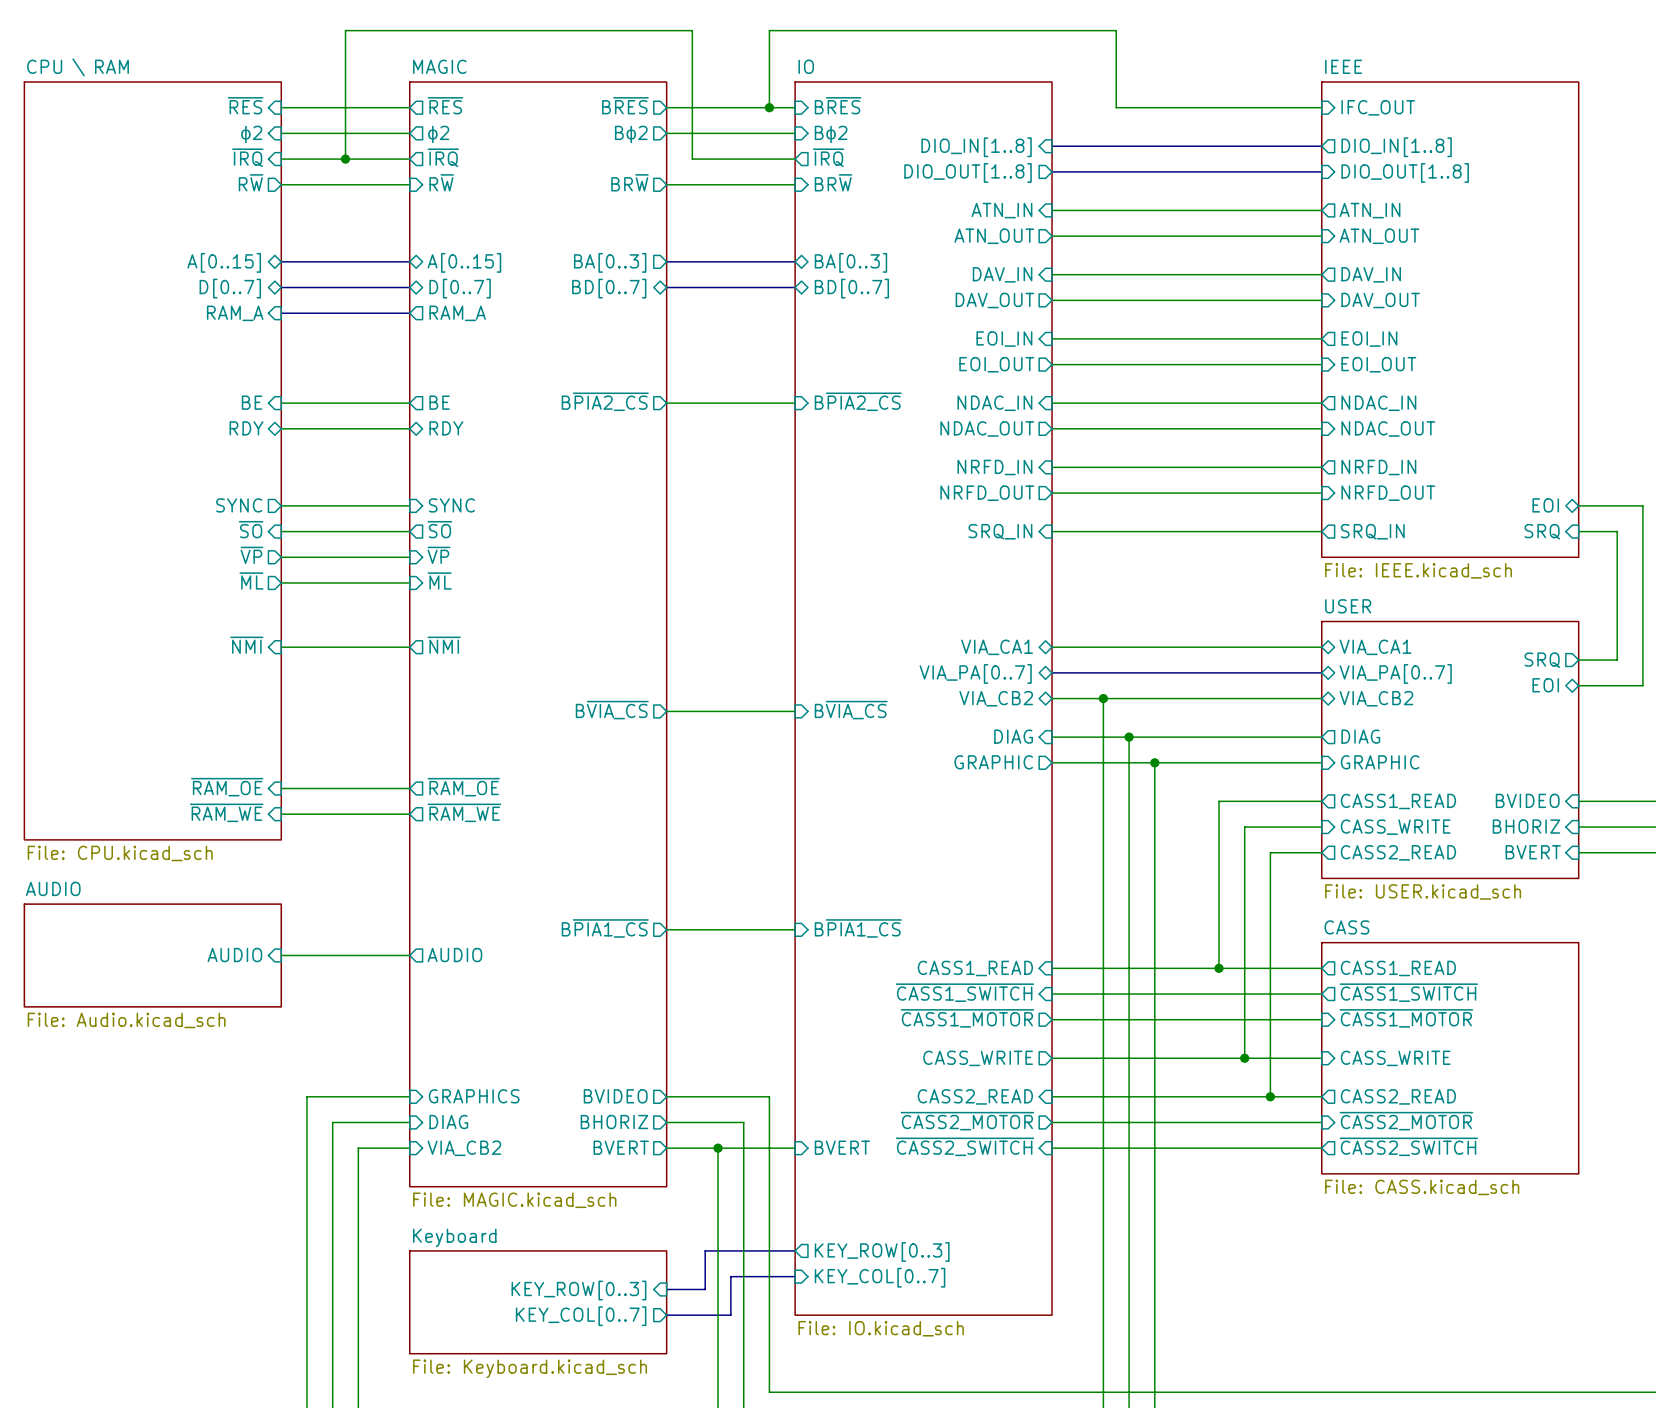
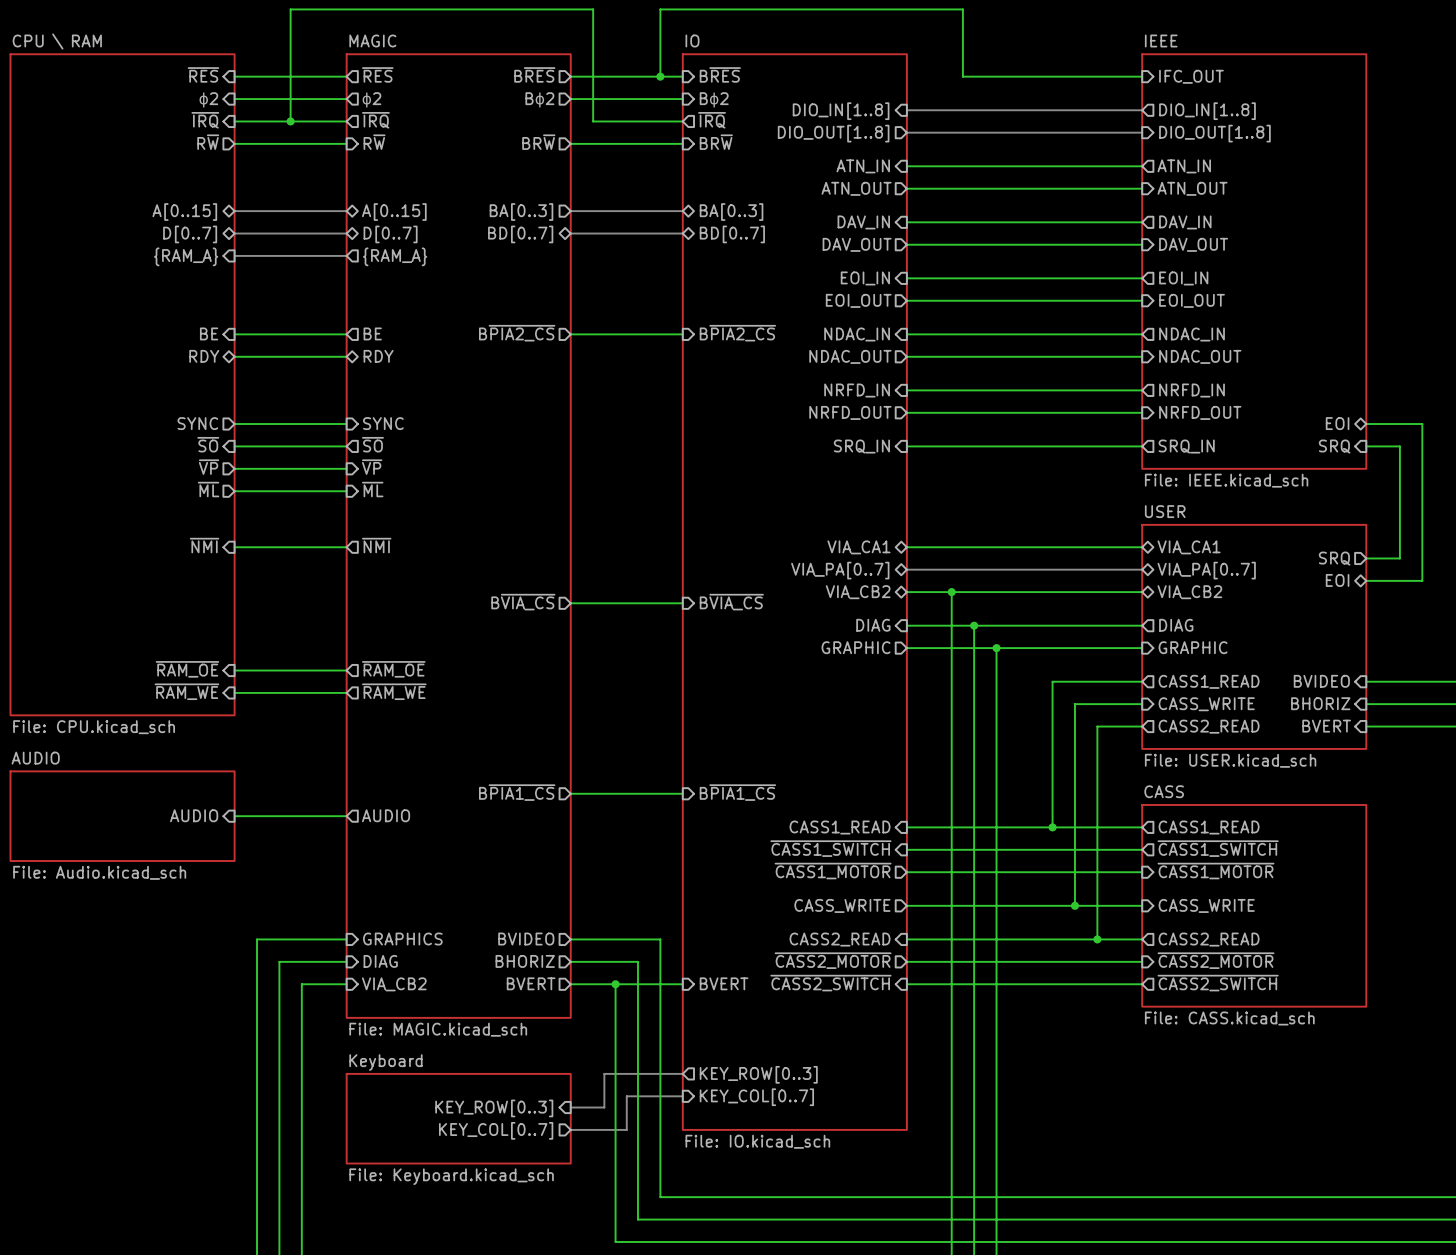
sheet pin: RAM_A (235, 313) -> {RAM_A} (186, 256)
sheet pin: RAM_A (457, 313) -> {RAM_A} (395, 256)

